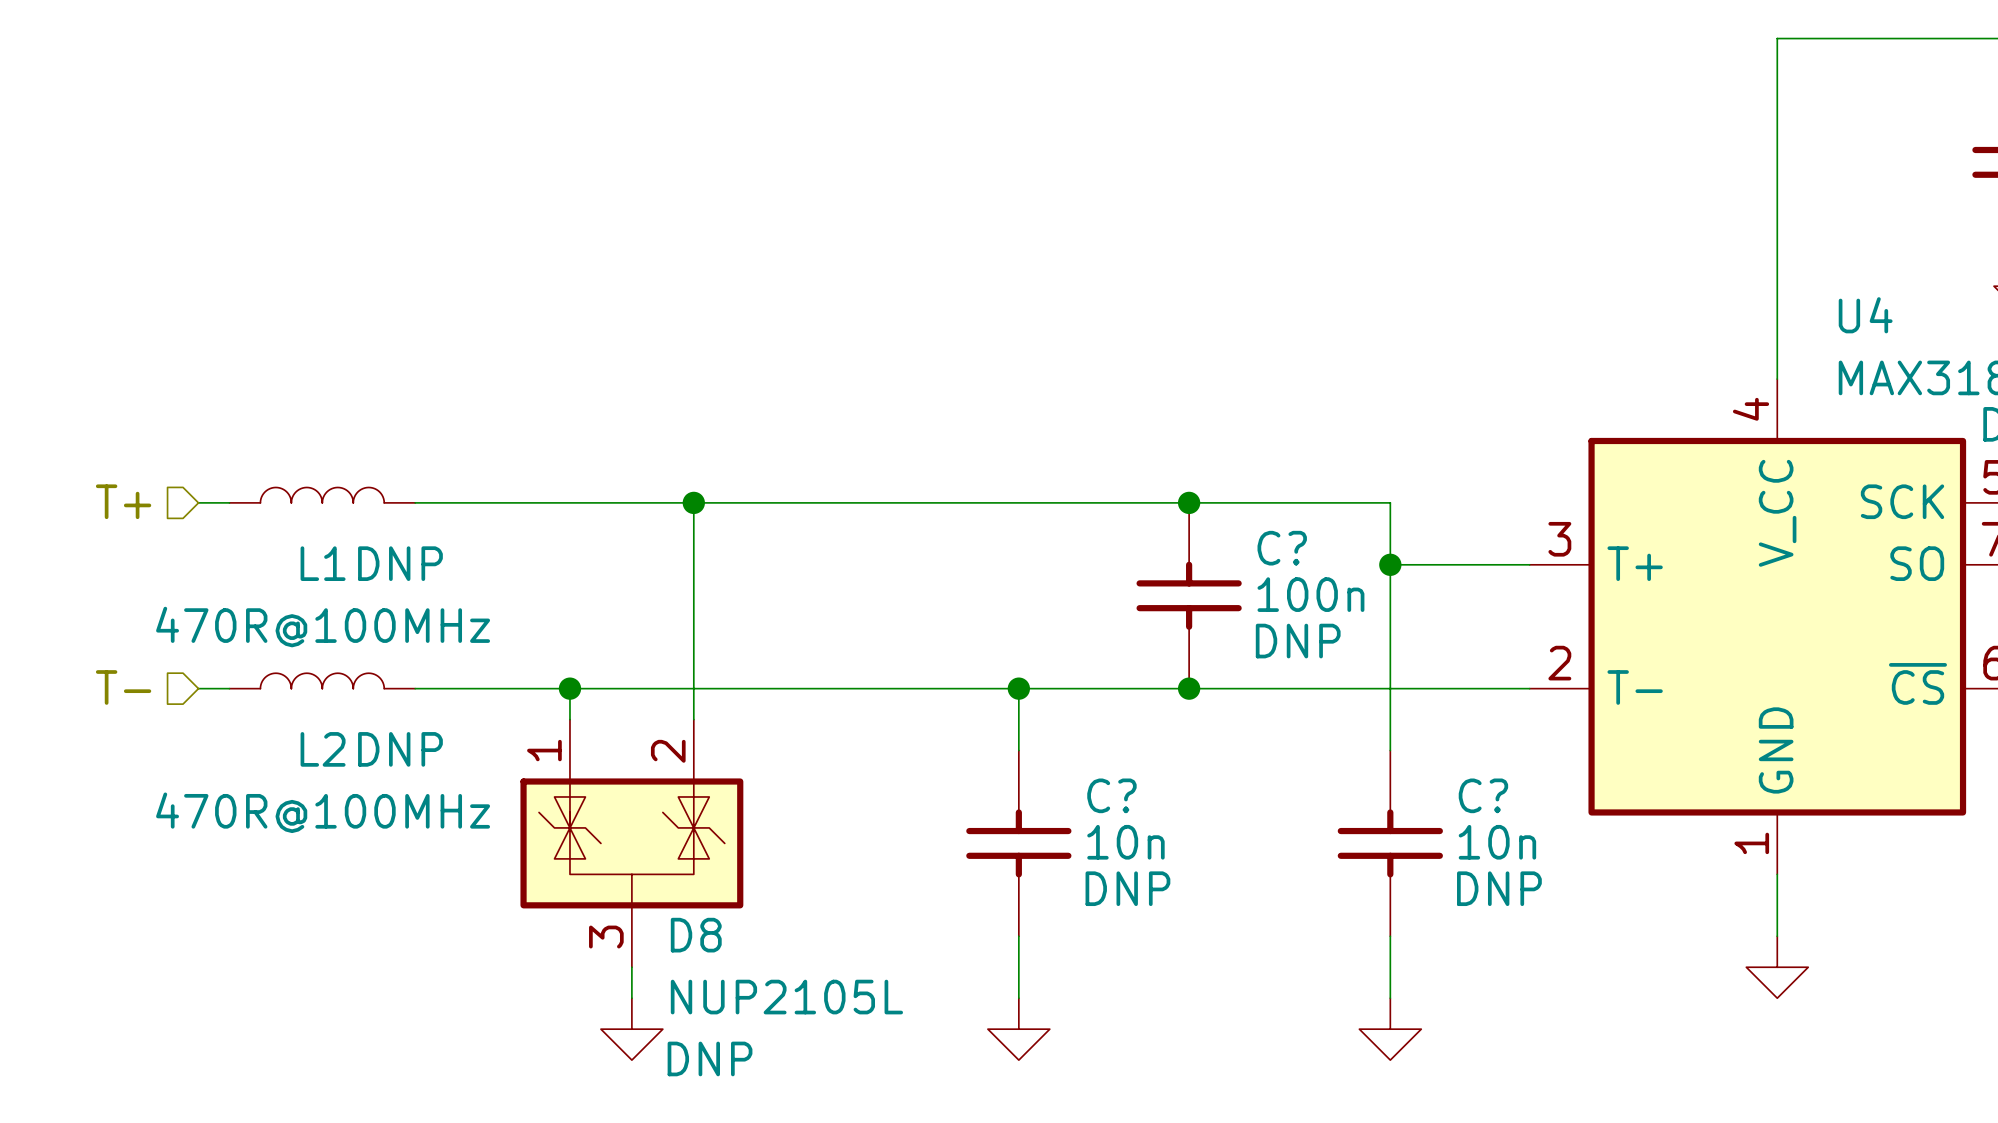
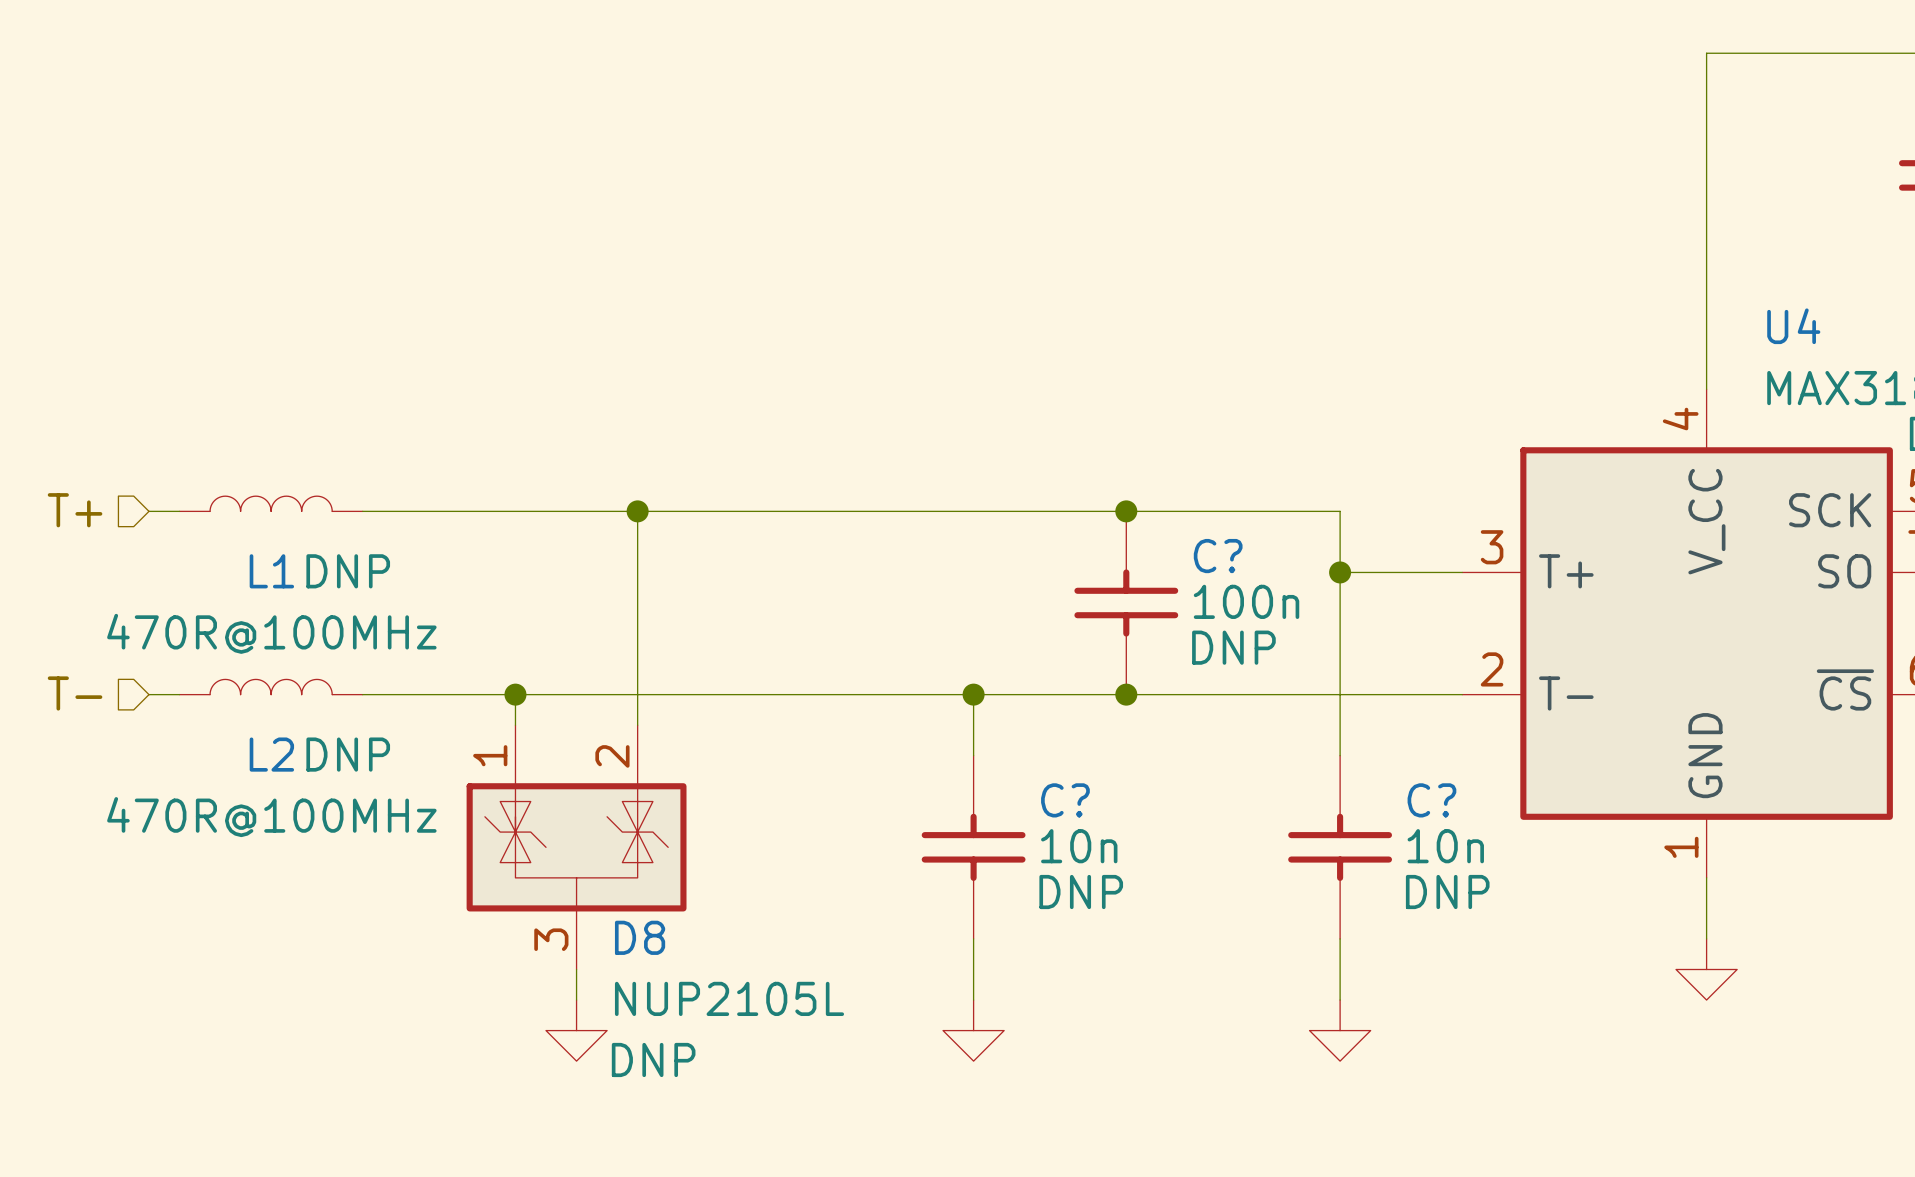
wire: (1390, 502) (1390, 750) -> (1324, 511) (1340, 511) (1340, 755)
junction position: (1390, 564) -> (1340, 572)
wire: (1018, 688) (1018, 750) -> (973, 694) (973, 755)
junction position: (1018, 688) -> (973, 694)
C? position: (1018, 843) -> (973, 847)
C? position: (1390, 843) -> (1340, 847)
wire: (1018, 936) (1018, 998) -> (973, 938) (973, 1000)
wire: (1390, 936) (1390, 998) -> (1340, 938) (1340, 1000)
power symbol position: (1018, 1029) -> (973, 1030)
power symbol position: (1390, 1029) -> (1340, 1030)

